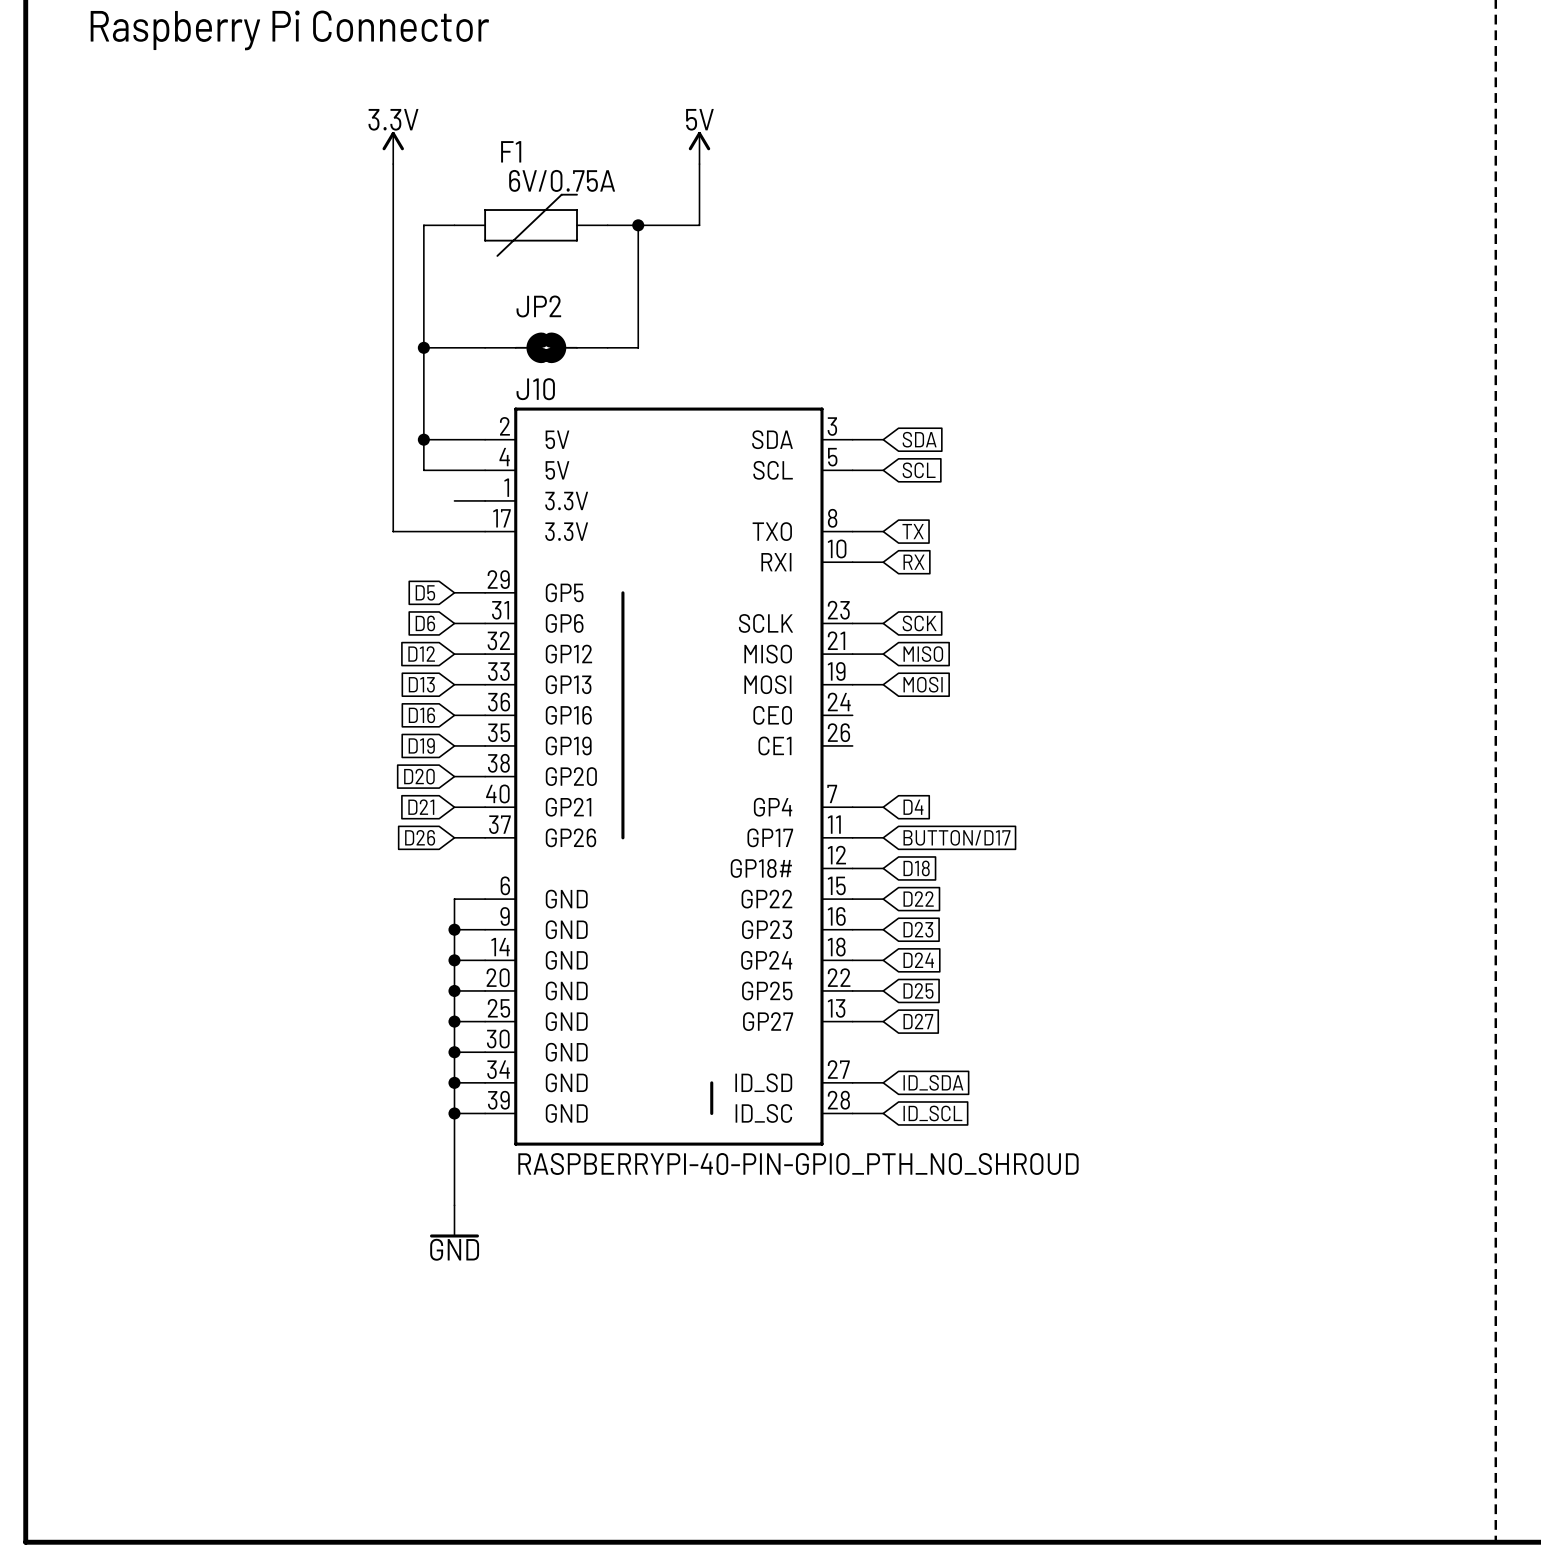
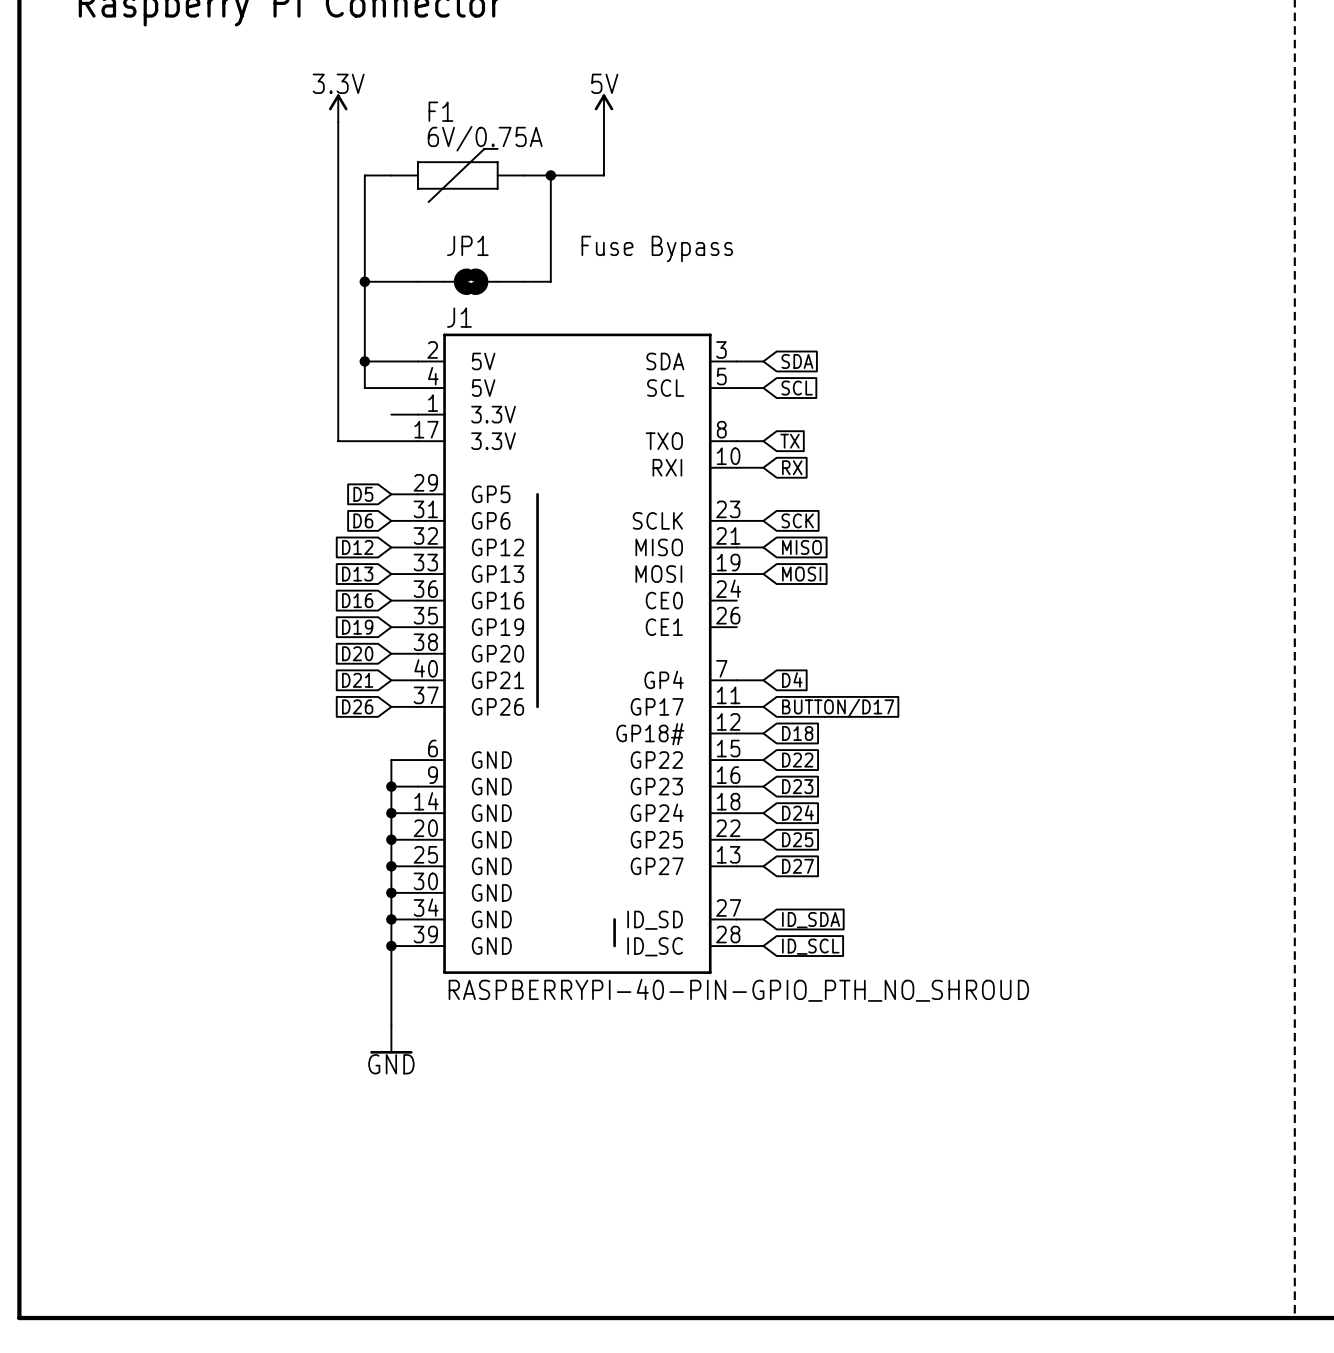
JP2 name: JP2 (538, 306) -> JP1 (467, 245)
text: none -> Fuse Bypass (657, 248)
J10 name: J10 (535, 389) -> J1 (459, 317)

